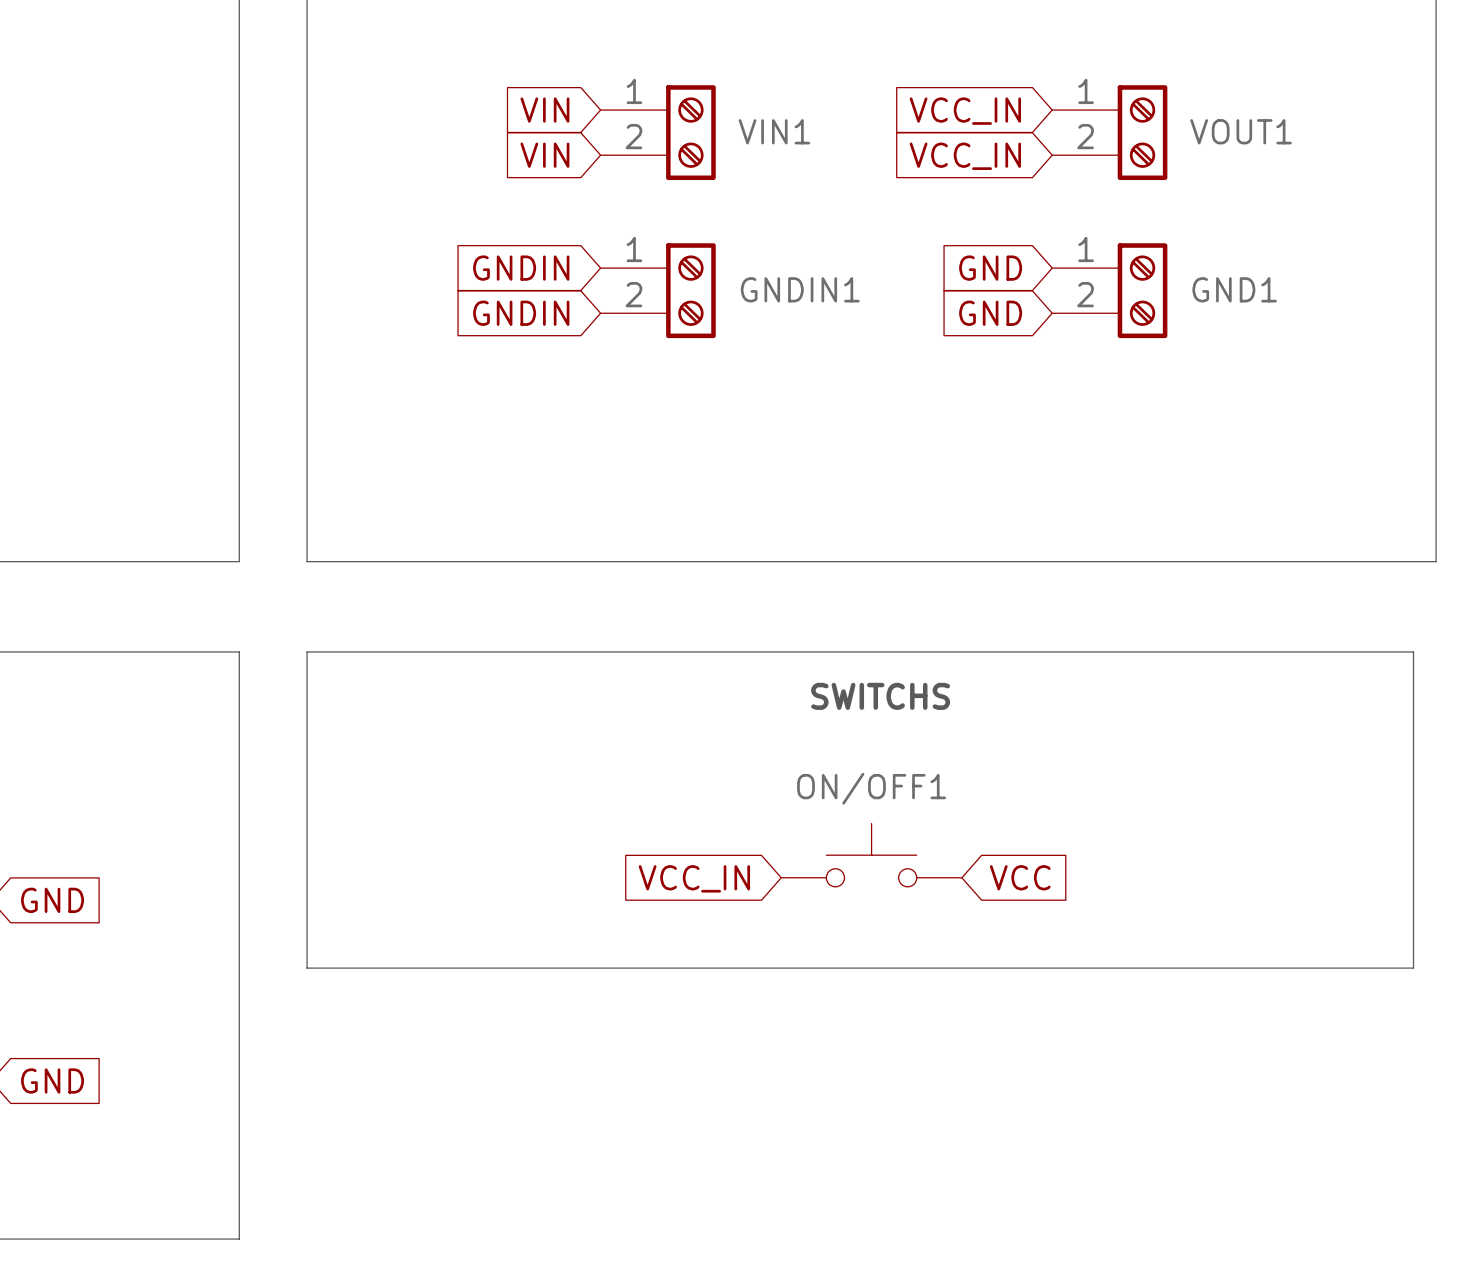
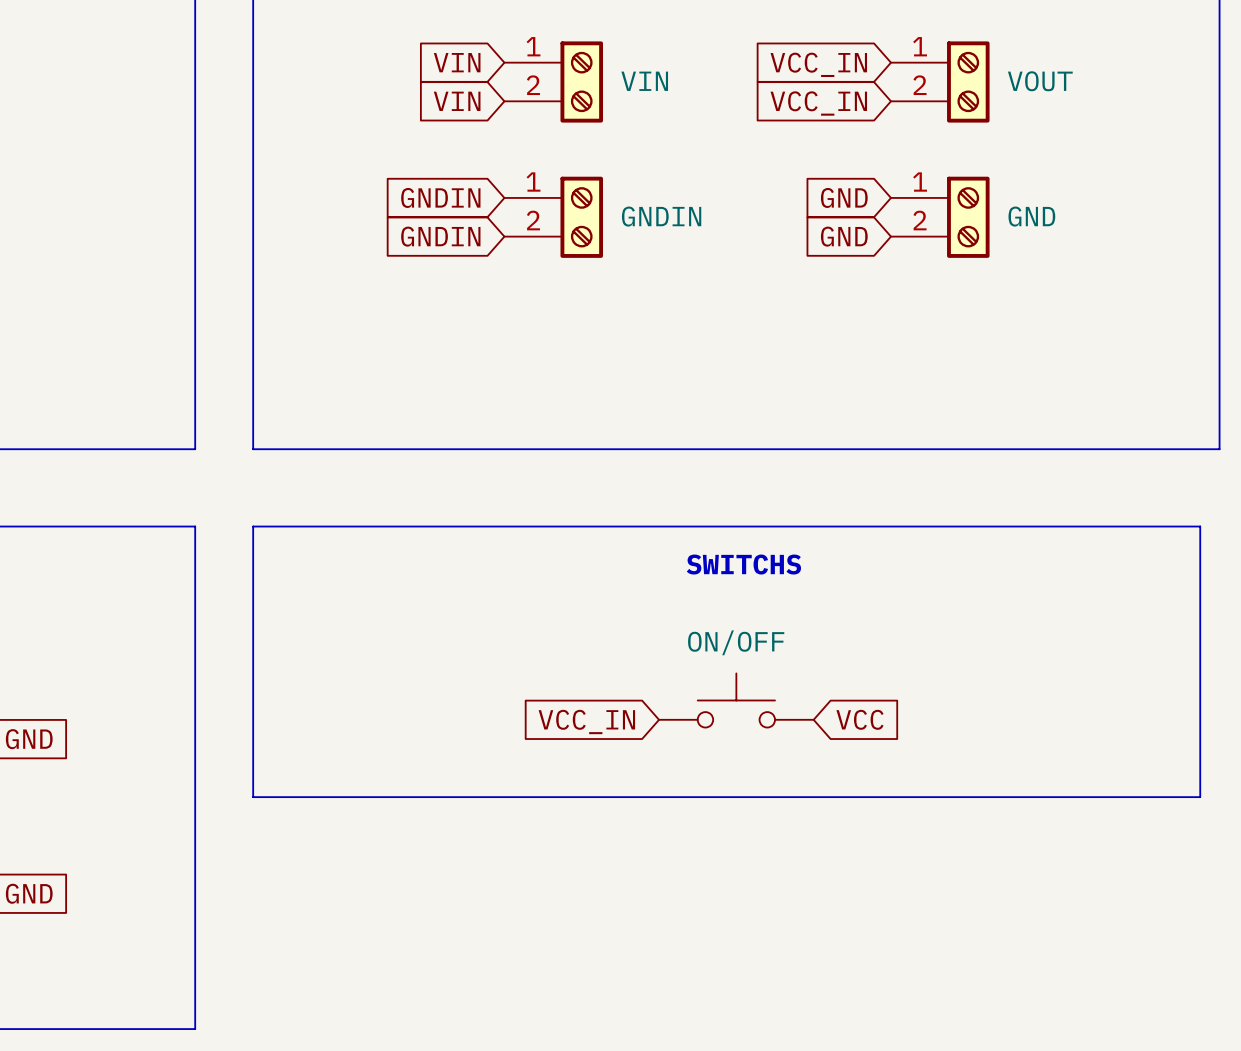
VIN1 name: VIN1 (774, 131) -> VIN (644, 81)
VOUT1 name: VOUT1 (1241, 131) -> VOUT (1040, 81)
GNDIN1 name: GNDIN1 (800, 289) -> GNDIN (661, 216)
GND1 name: GND1 (1234, 289) -> GND (1031, 216)
ON/OFF1 name: ON/OFF1 (871, 788) -> ON/OFF (736, 642)

